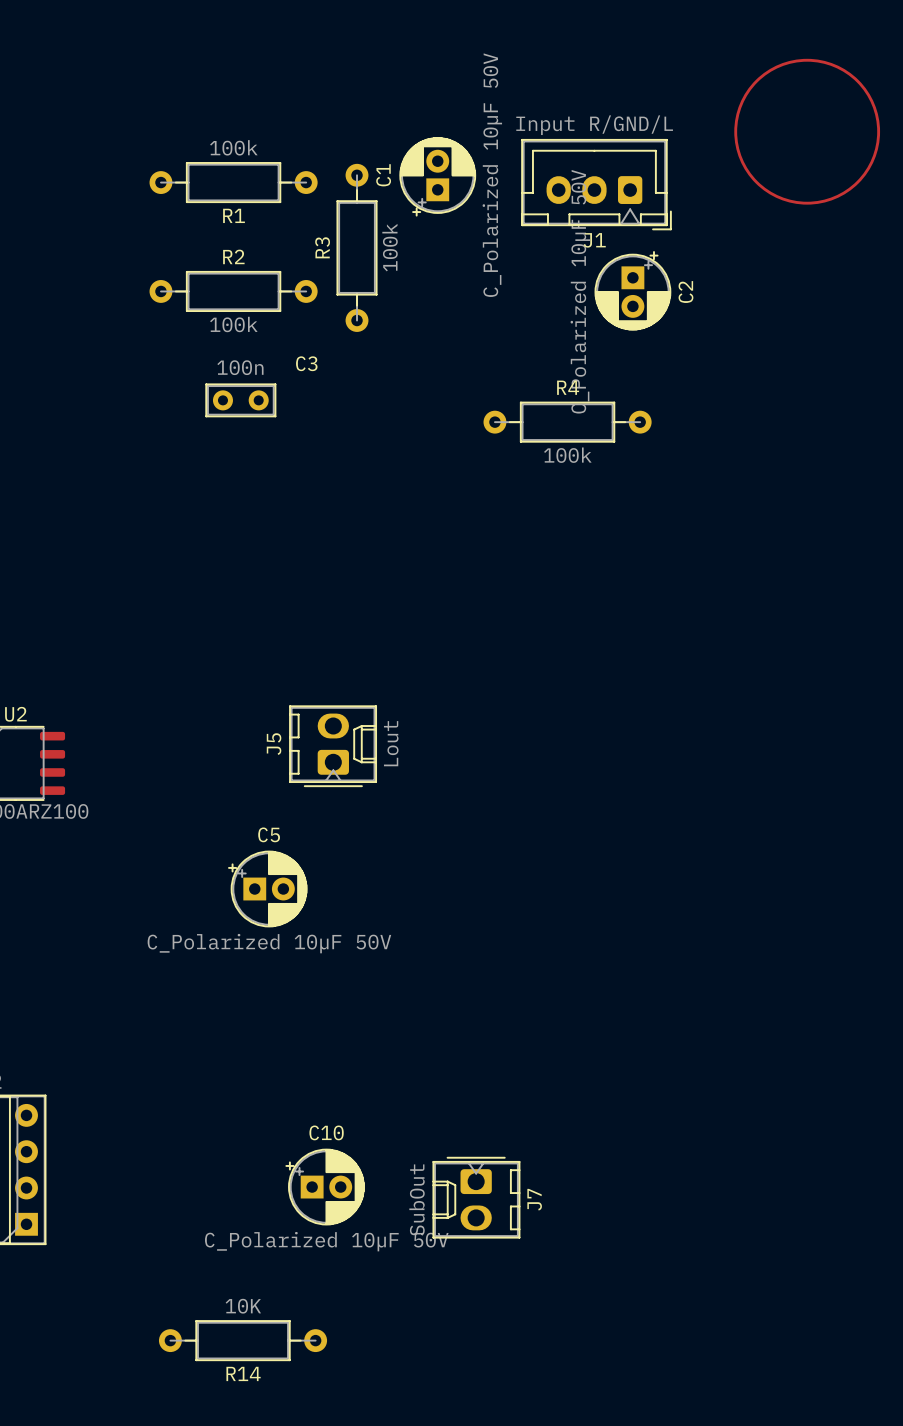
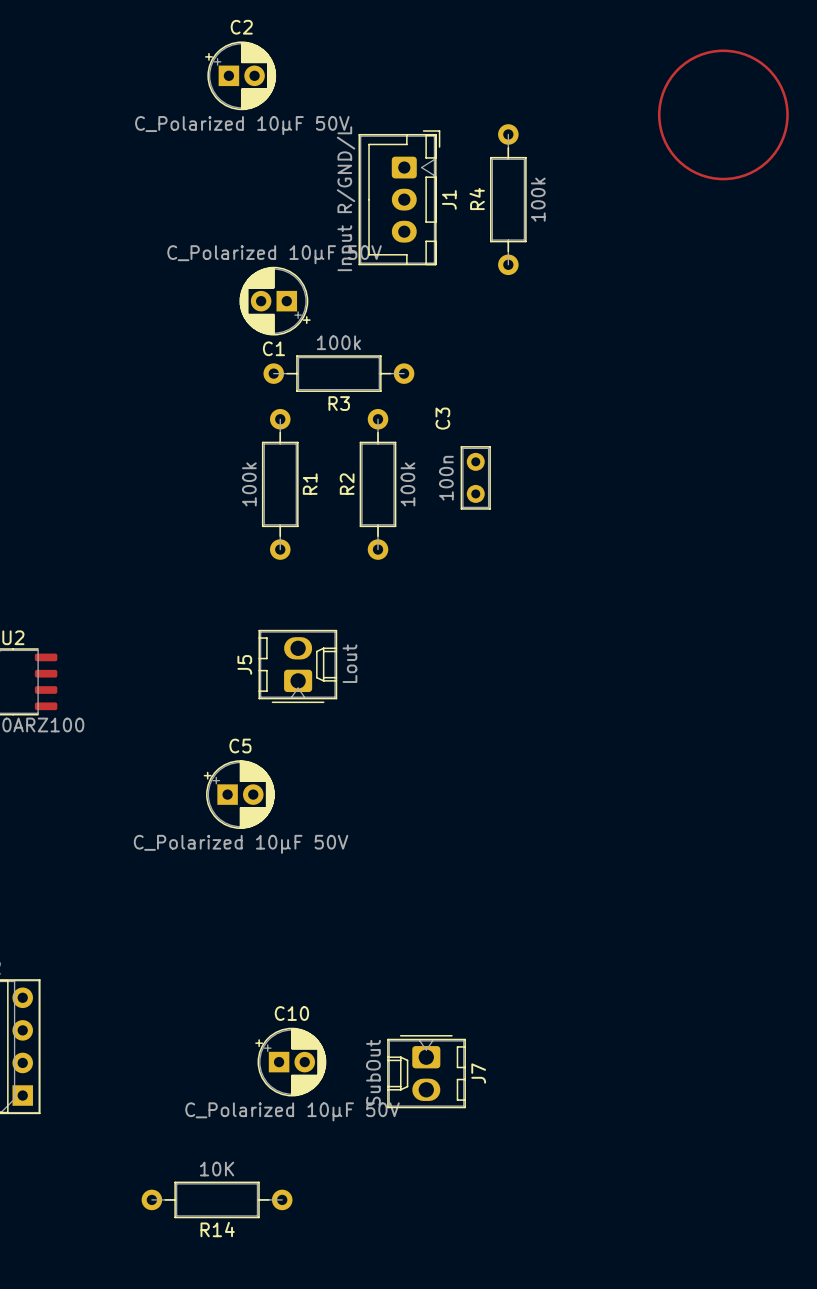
R1 value position: 100k (233, 147) -> 100k (249, 484)
C1 rotation: 0° (437, 176) -> 90° counterclockwise (275, 301)
C1 position: (437, 176) -> (275, 301)
R1 rotation: 0° (233, 182) -> 90° clockwise (280, 484)
R1 position: (233, 182) -> (280, 484)
J1 rotation: 0° (596, 184) -> 90° counterclockwise (399, 197)
J1 position: (596, 184) -> (399, 197)
R1 name position: R1 (234, 215) -> R1 (310, 484)
R3 name position: R3 (322, 247) -> R3 (339, 403)
R3 rotation: 0° (357, 247) -> 90° clockwise (338, 373)
R3 position: (357, 247) -> (338, 373)
R3 value position: 100k (390, 247) -> 100k (338, 342)
R2 name position: R2 (233, 256) -> R2 (347, 484)
C2 rotation: 0° (632, 290) -> 90° counterclockwise (240, 75)
C2 position: (632, 290) -> (240, 75)
R2 rotation: 0° (233, 291) -> 90° clockwise (378, 484)
R2 position: (233, 291) -> (378, 484)
R2 value position: 100k (233, 324) -> 100k (407, 484)
C3 name position: C3 (306, 363) -> C3 (442, 418)
C3 value position: 100n (240, 367) -> 100n (446, 478)
R4 name position: R4 (568, 387) -> R4 (477, 199)
C3 rotation: 0° (240, 400) -> 90° clockwise (475, 477)
C3 position: (240, 400) -> (475, 477)
R4 rotation: 0° (567, 422) -> 90° clockwise (508, 199)
R4 position: (567, 422) -> (508, 199)
R4 value position: 100k (567, 455) -> 100k (538, 199)

